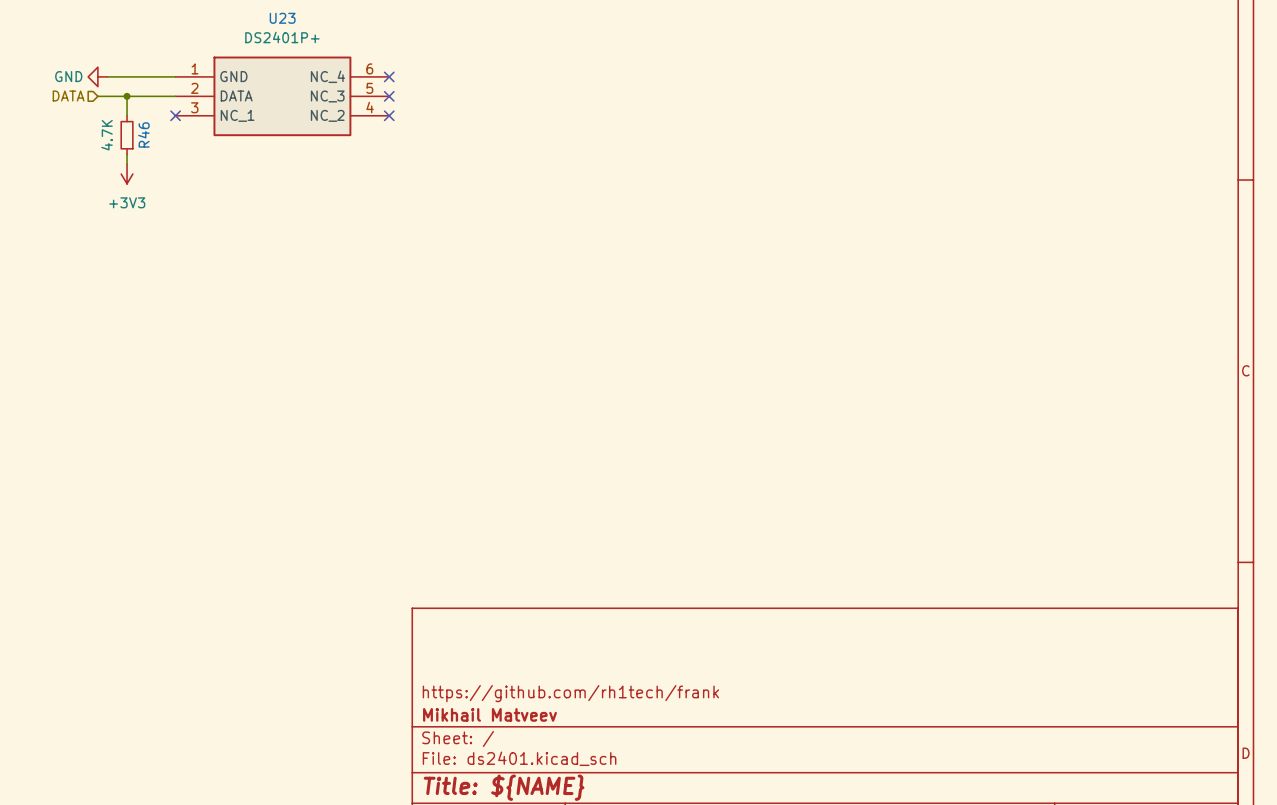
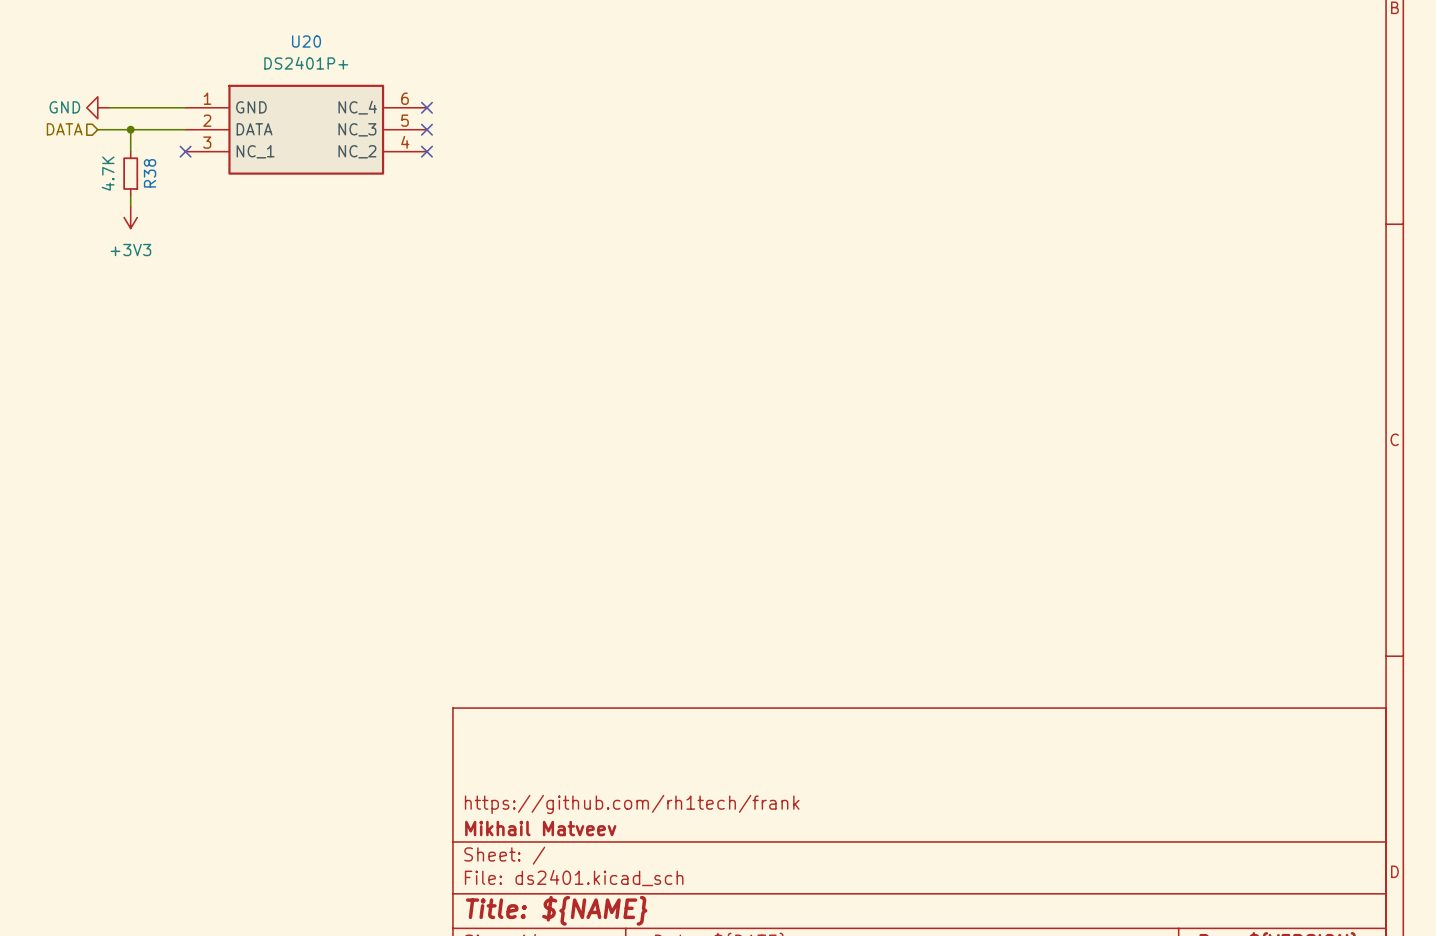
U23 name: U23 (282, 18) -> U20 (306, 41)
R46 name: R46 (143, 134) -> R38 (150, 173)

